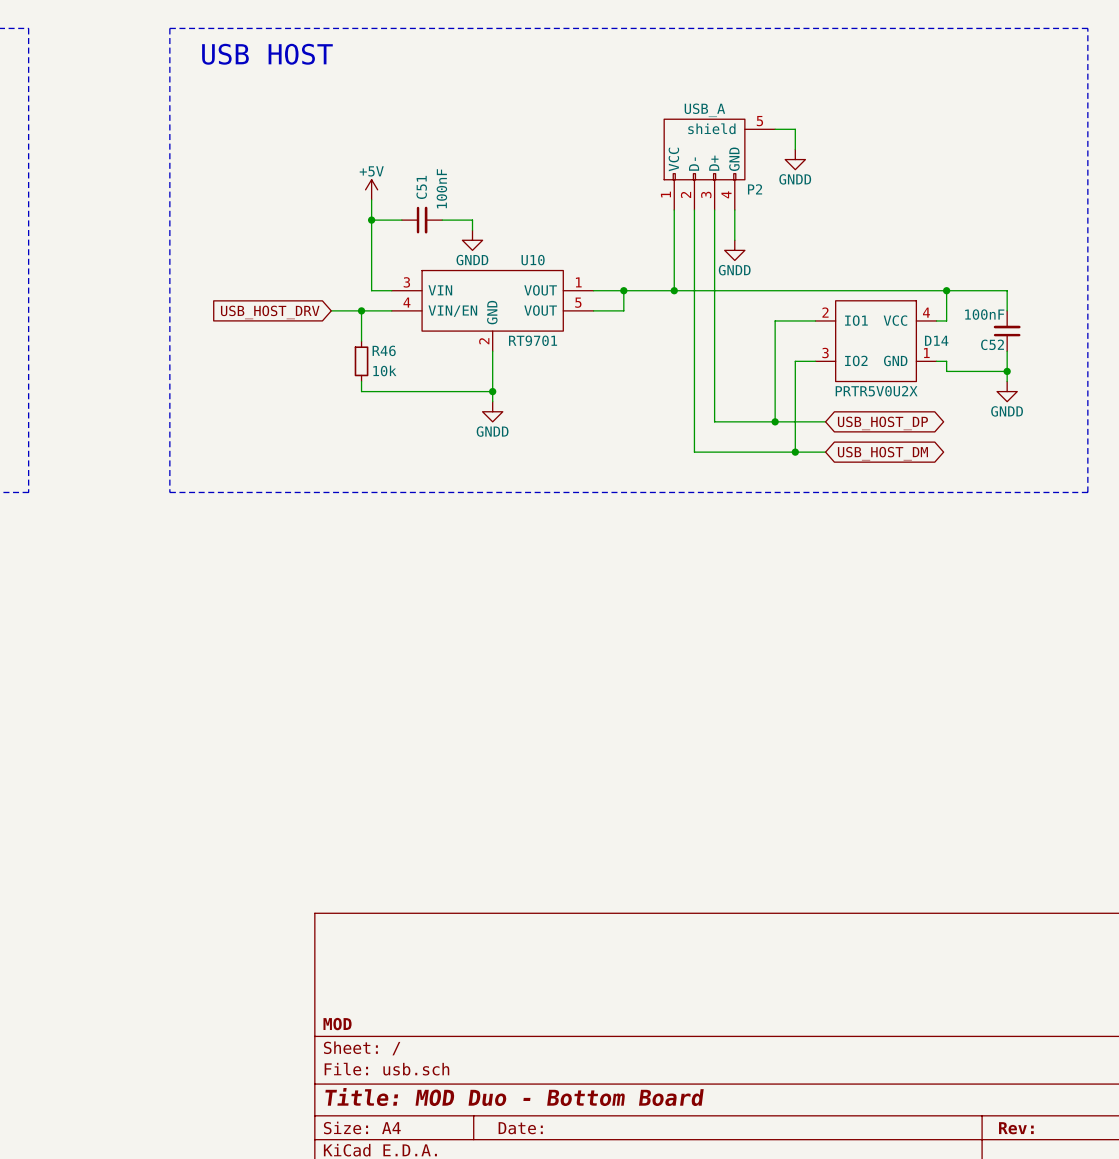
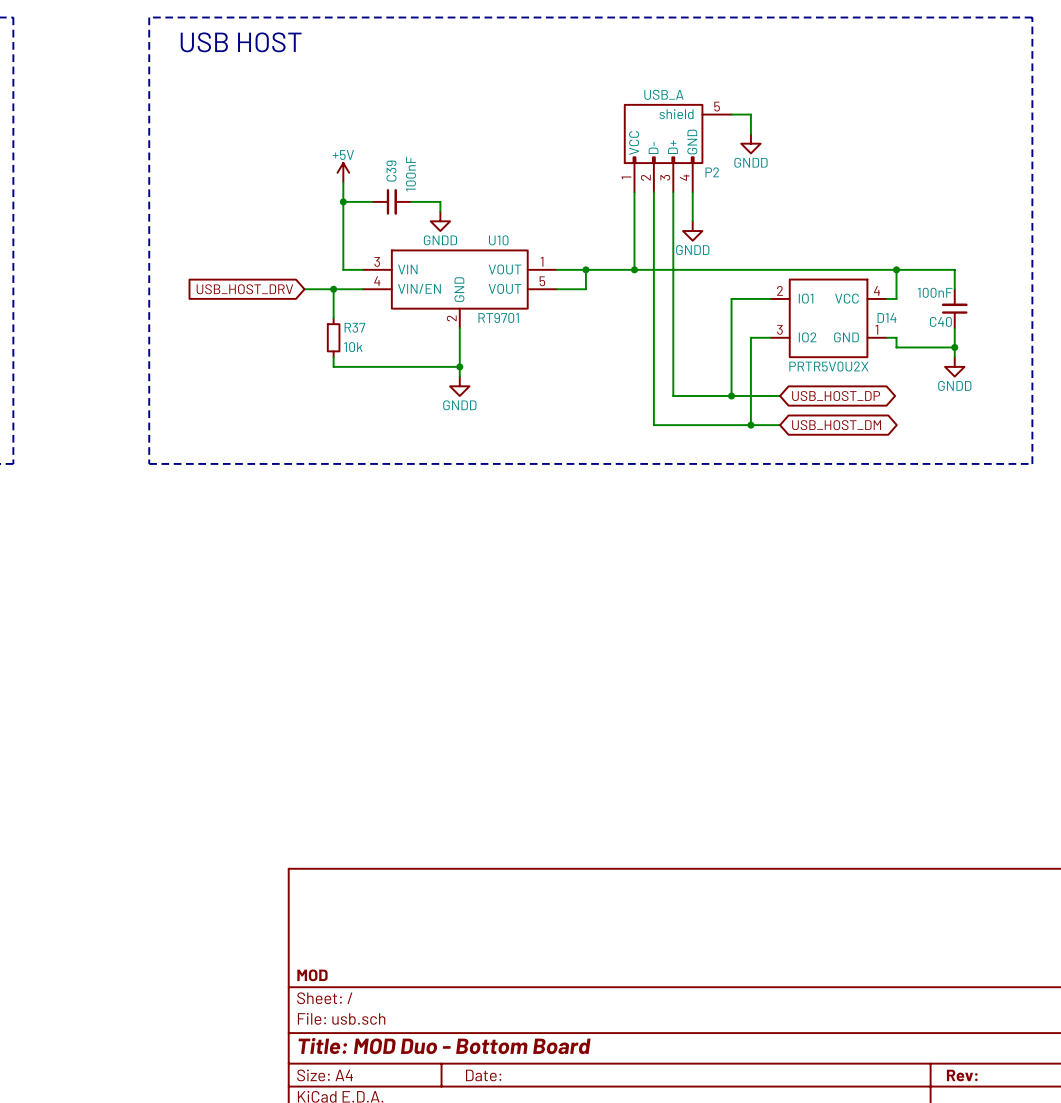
C51 name: C51 (421, 187) -> C39 (391, 171)
C52 name: C52 (992, 344) -> C40 (940, 321)
R46 name: R46 (384, 350) -> R37 (354, 327)

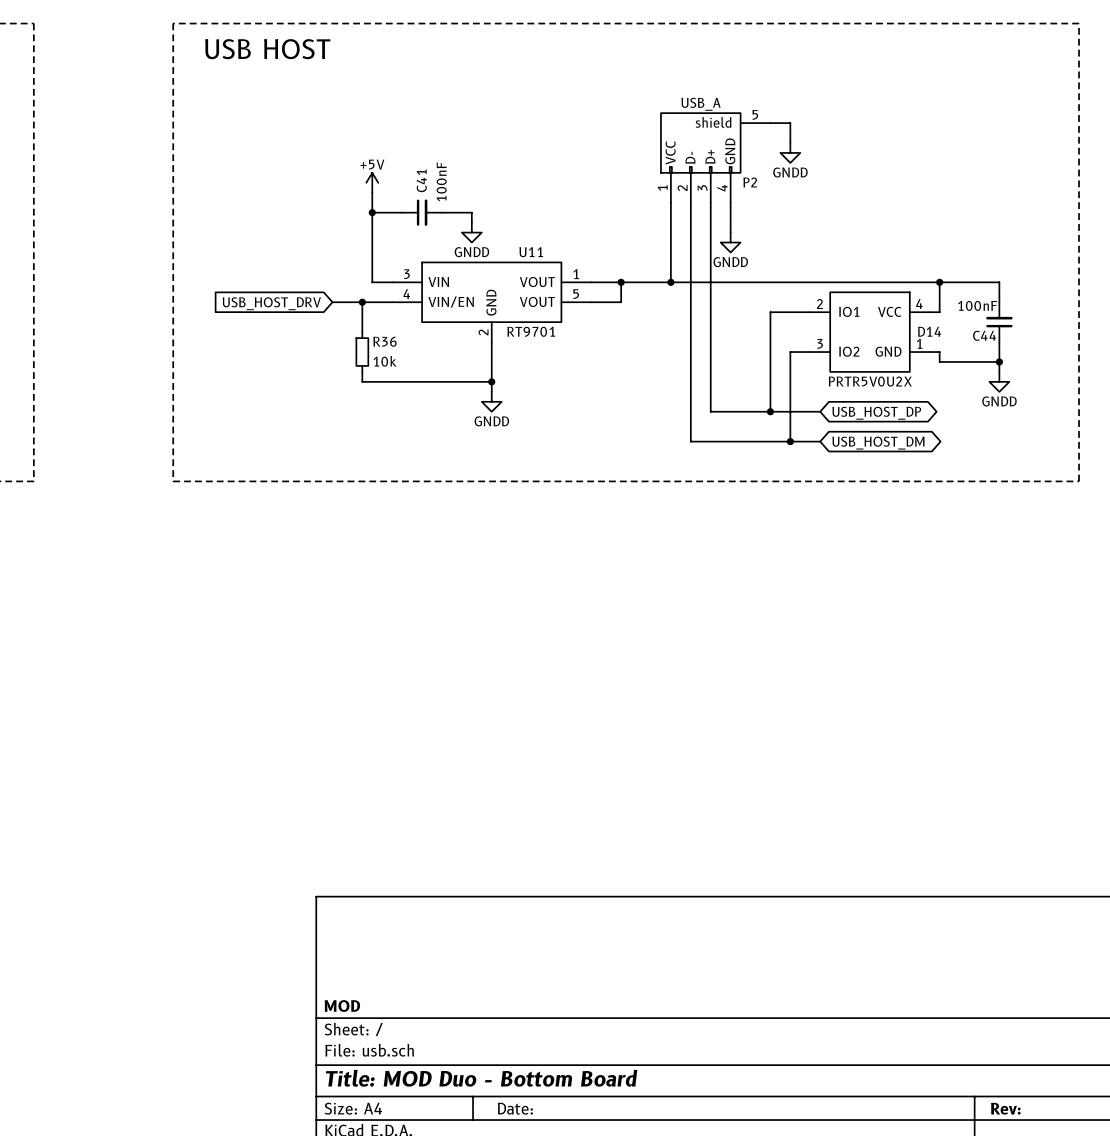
C39 name: C39 (391, 171) -> C41 (421, 180)
U10 name: U10 (498, 240) -> U11 (531, 252)
C40 name: C40 (940, 321) -> C44 (984, 335)
R37 name: R37 (354, 327) -> R36 (385, 341)

